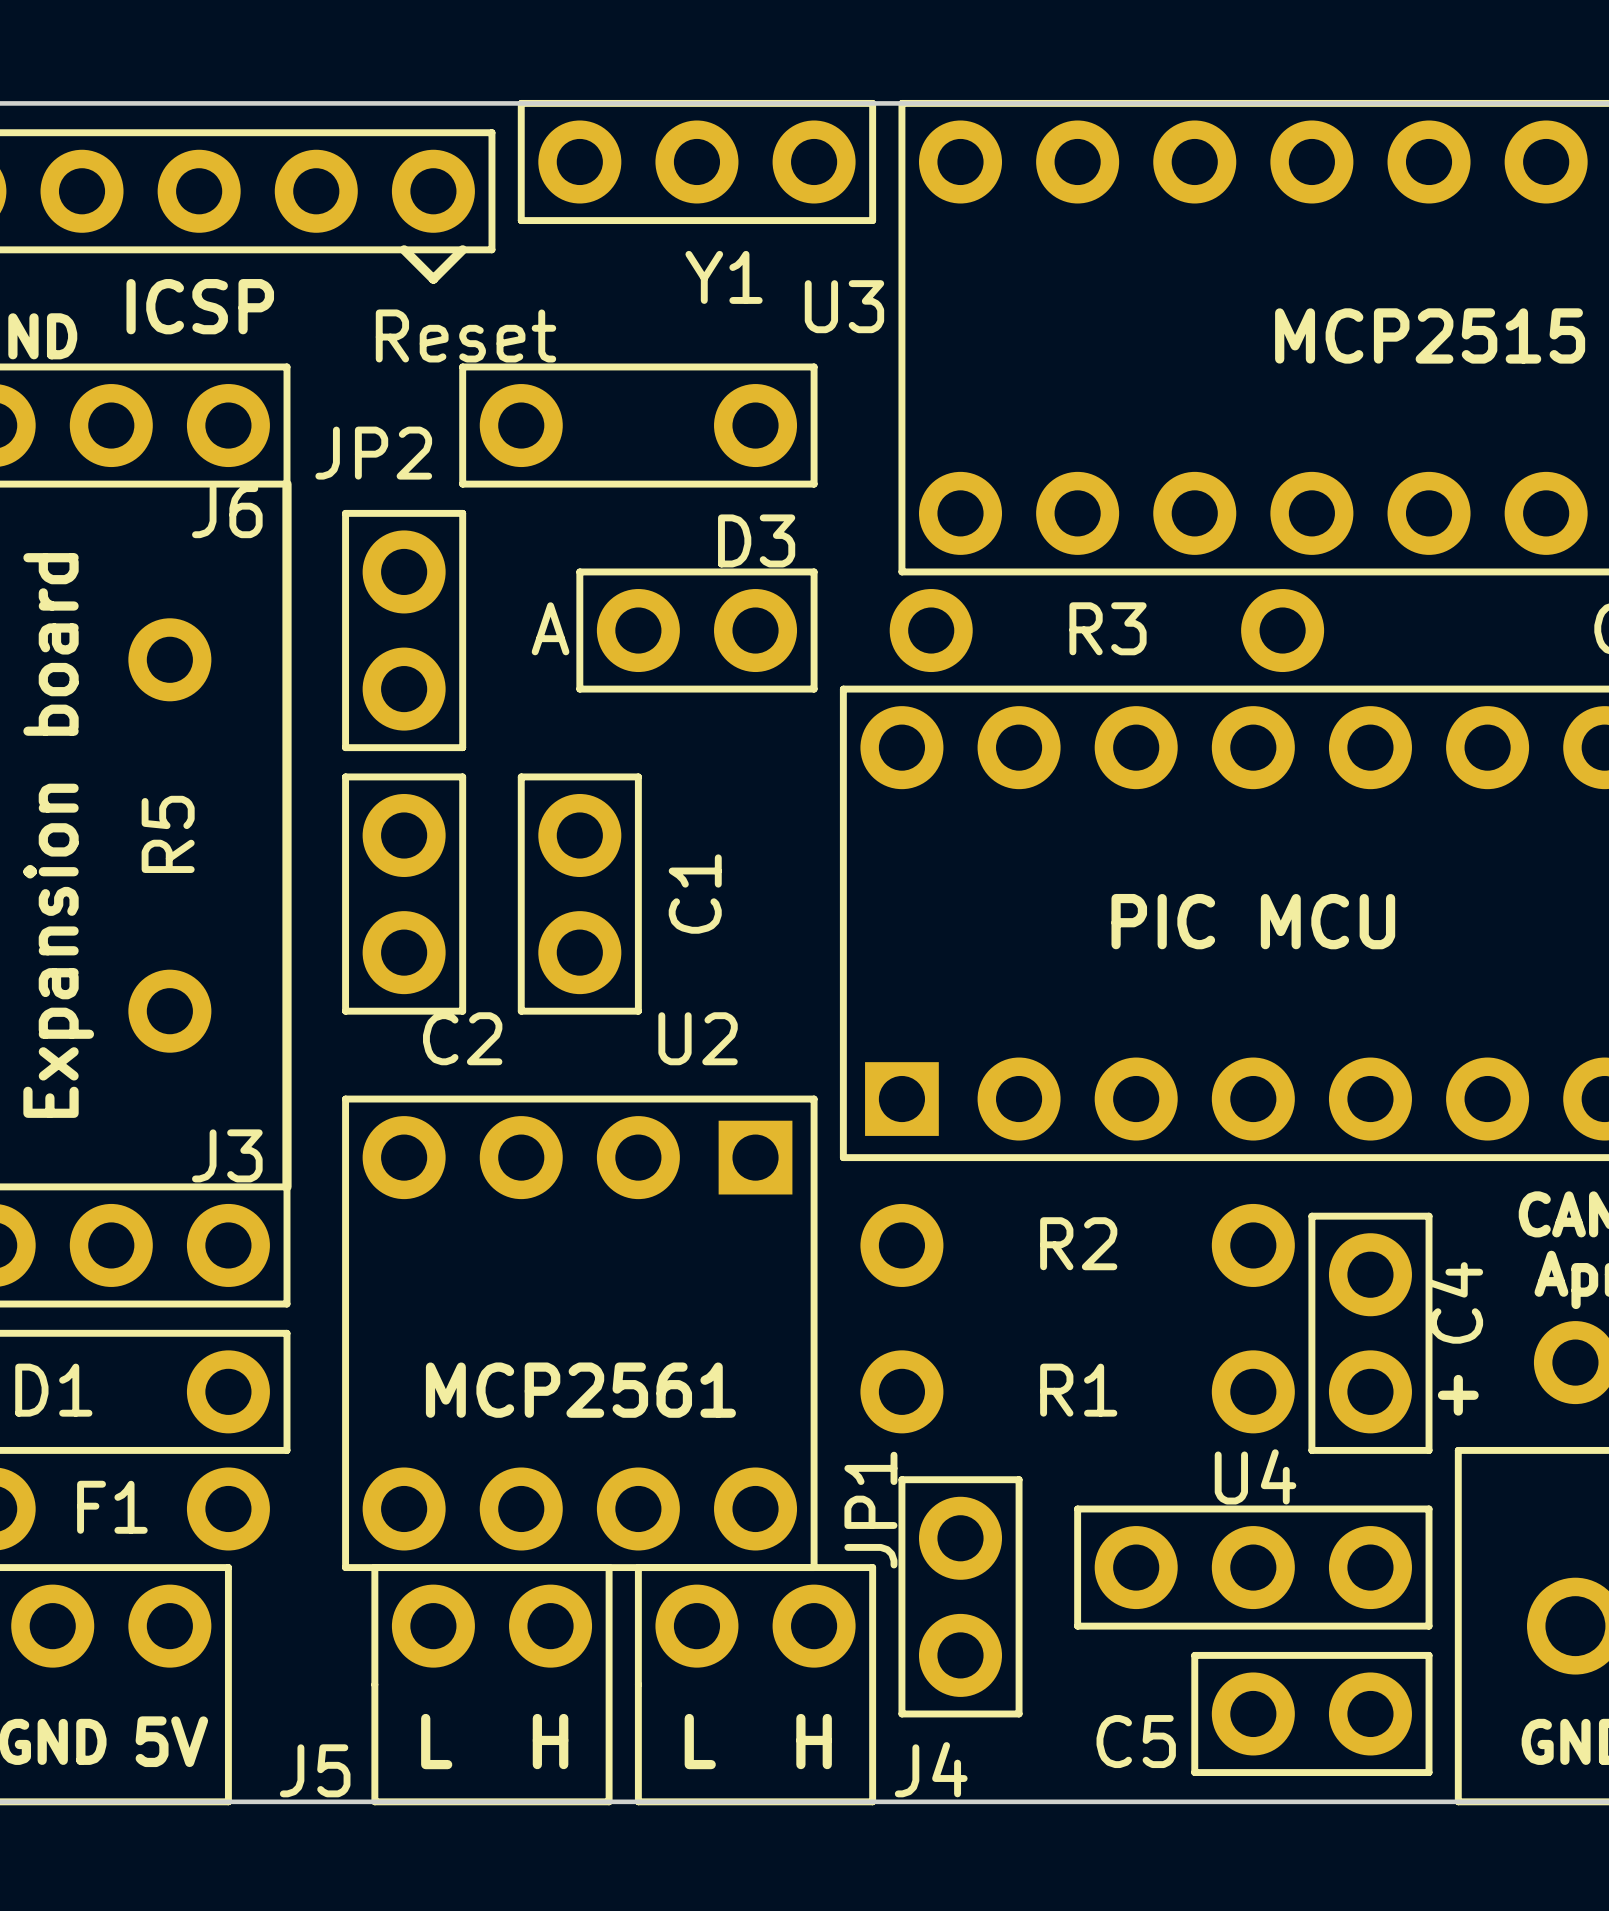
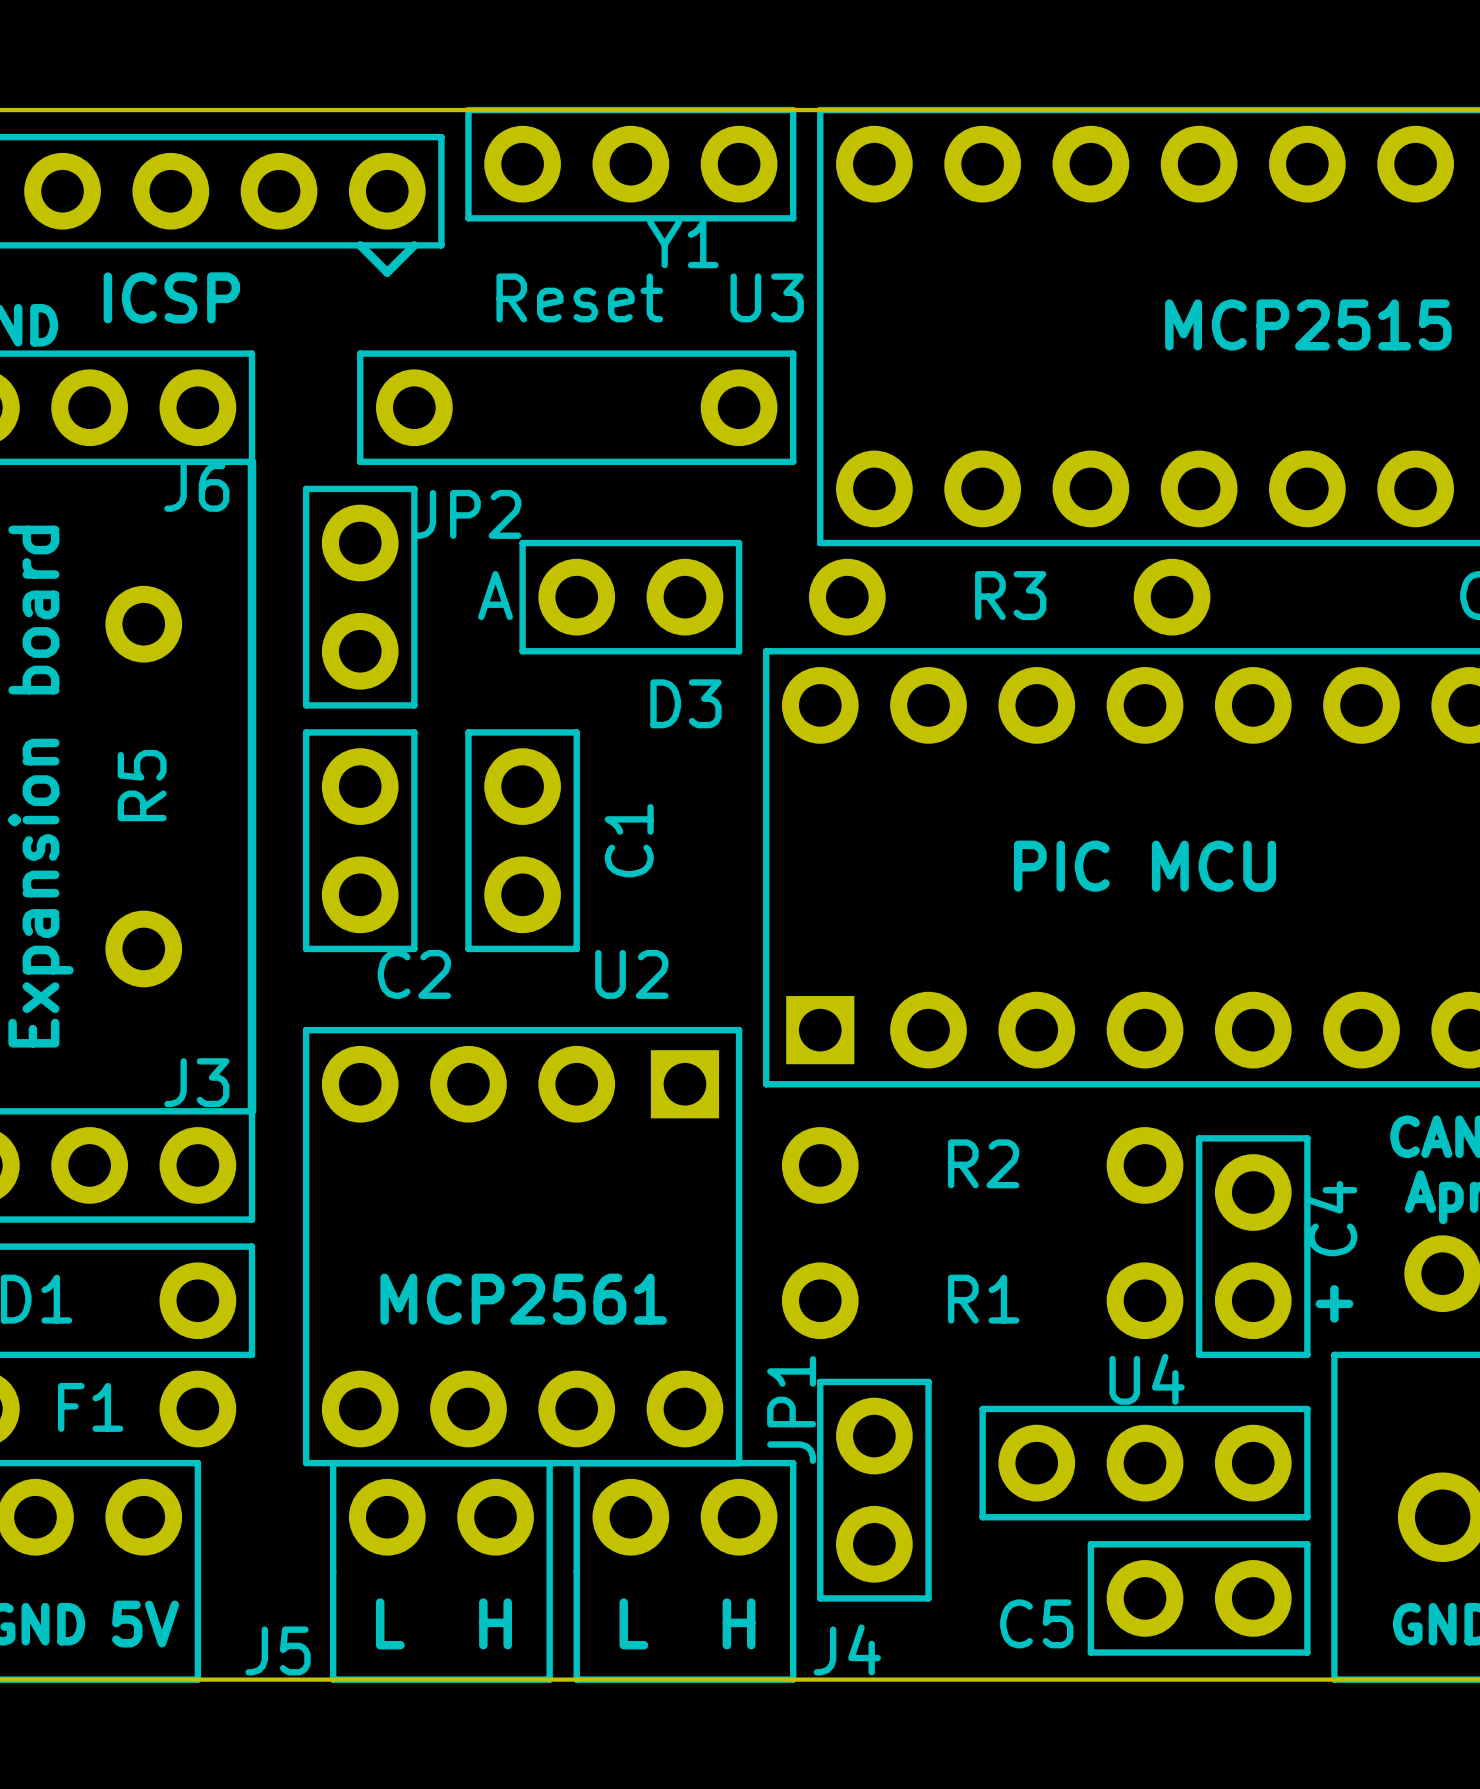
Y1 name position: Y1 (724, 277) -> Y1 (682, 243)
Reset name position: Reset (465, 335) -> Reset (579, 297)
Reset footprint: [459, 363, 818, 488] -> [357, 350, 797, 466]
JP2 name position: JP2 (373, 453) -> JP2 (467, 514)
D3 name position: D3 (756, 540) -> D3 (685, 703)

